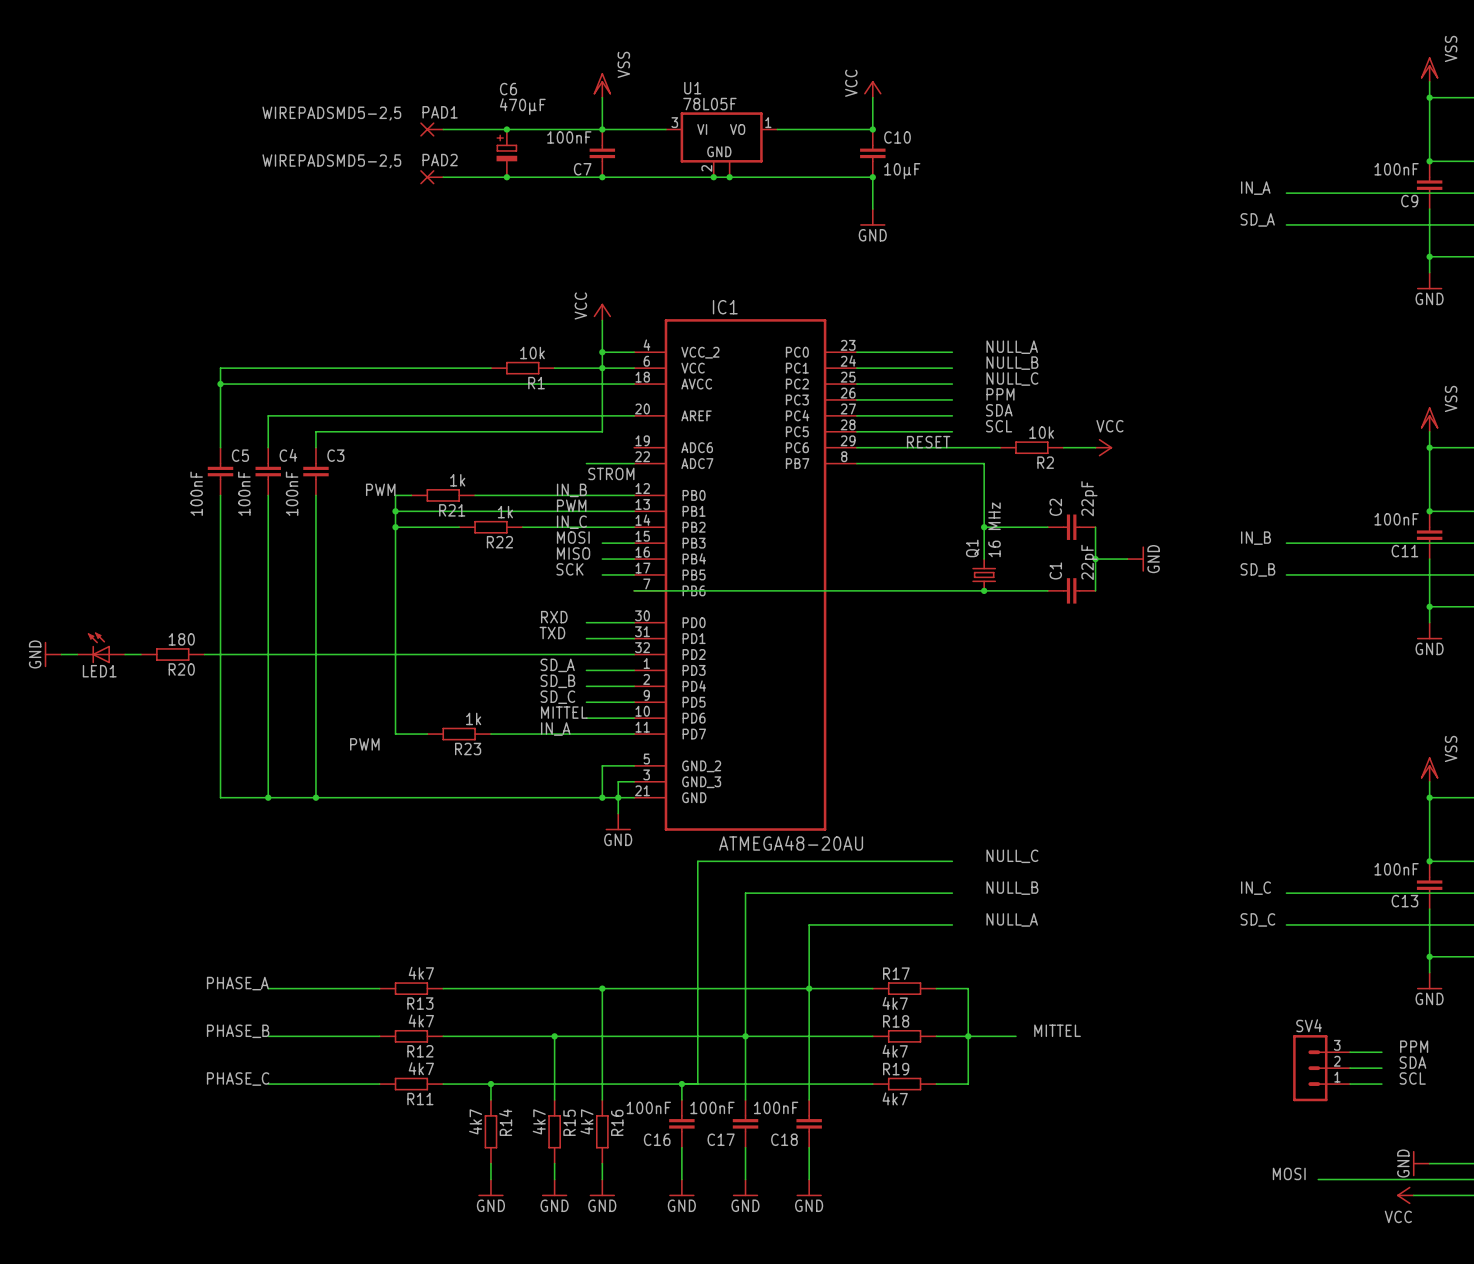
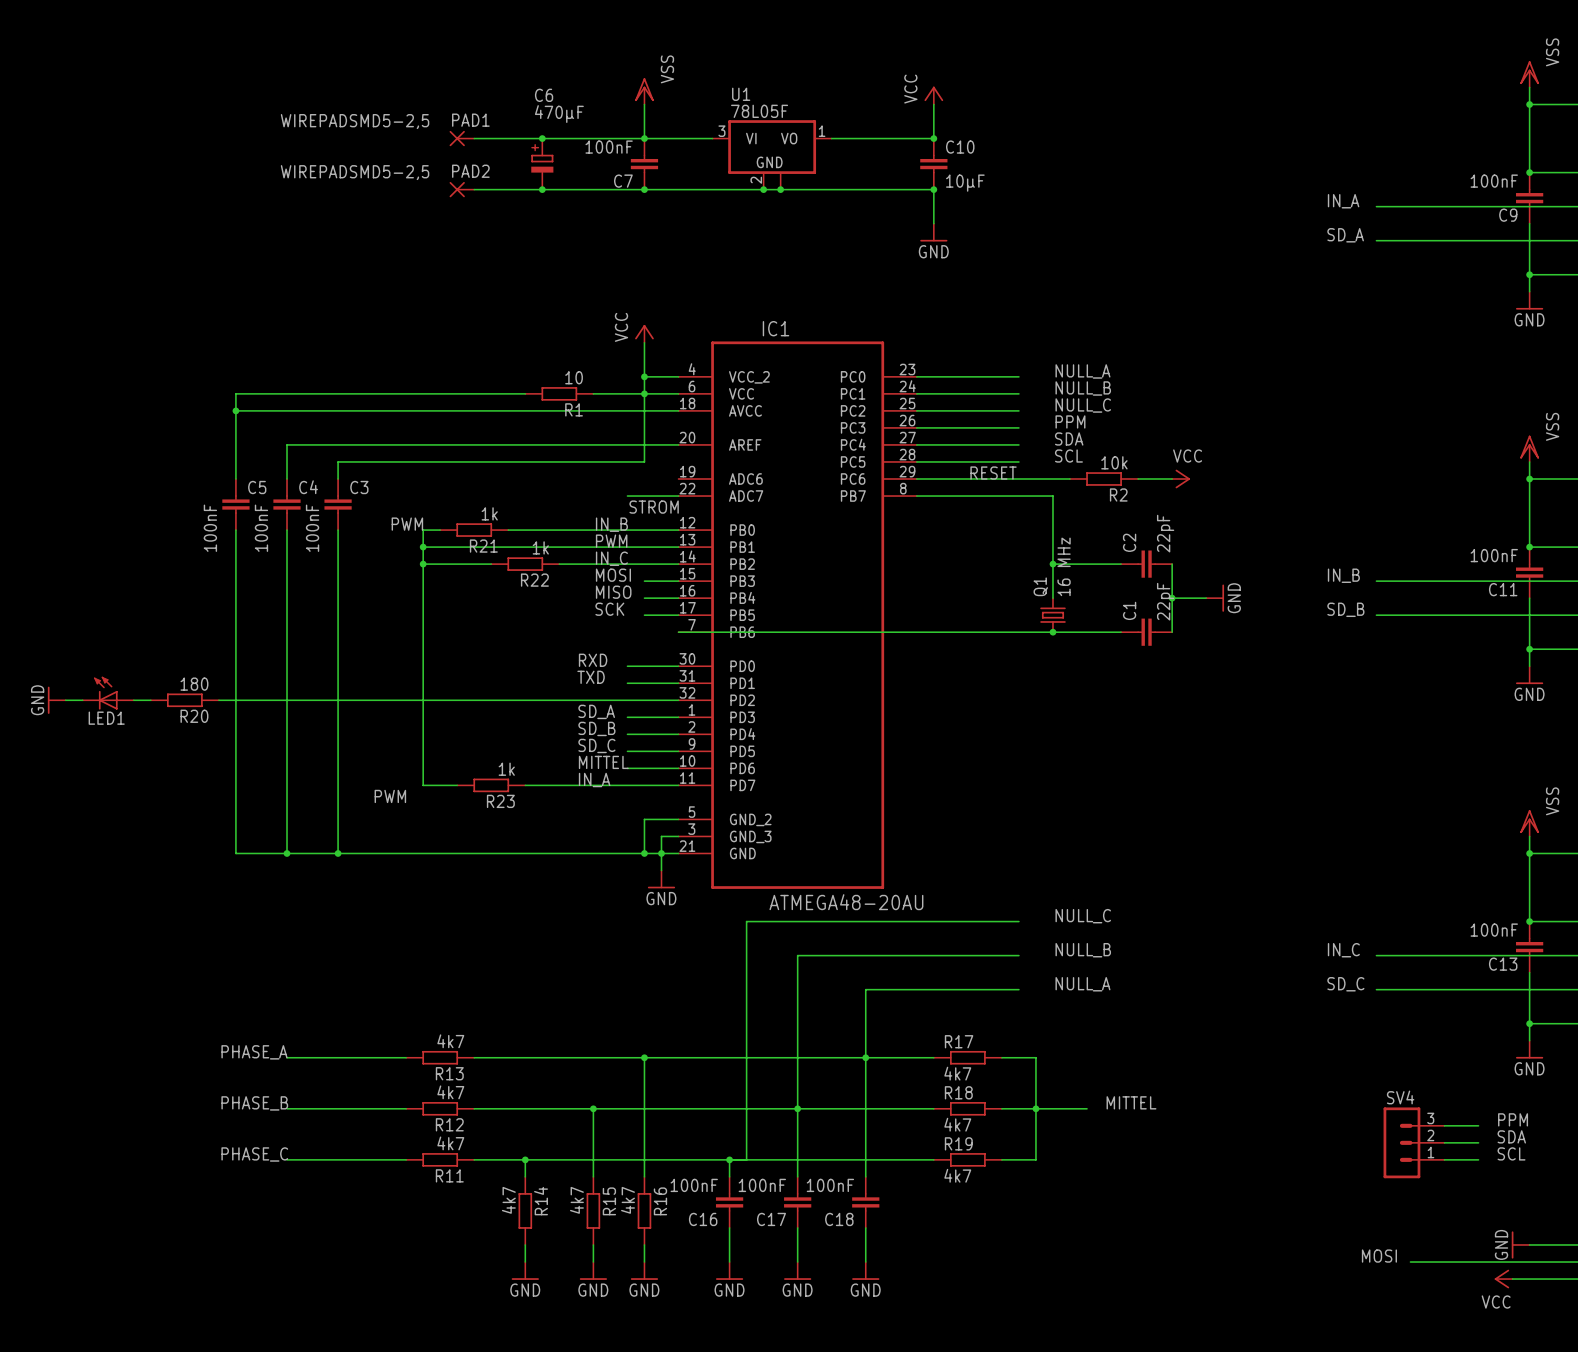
R1 value: 10k (532, 353) -> 10 (574, 377)

